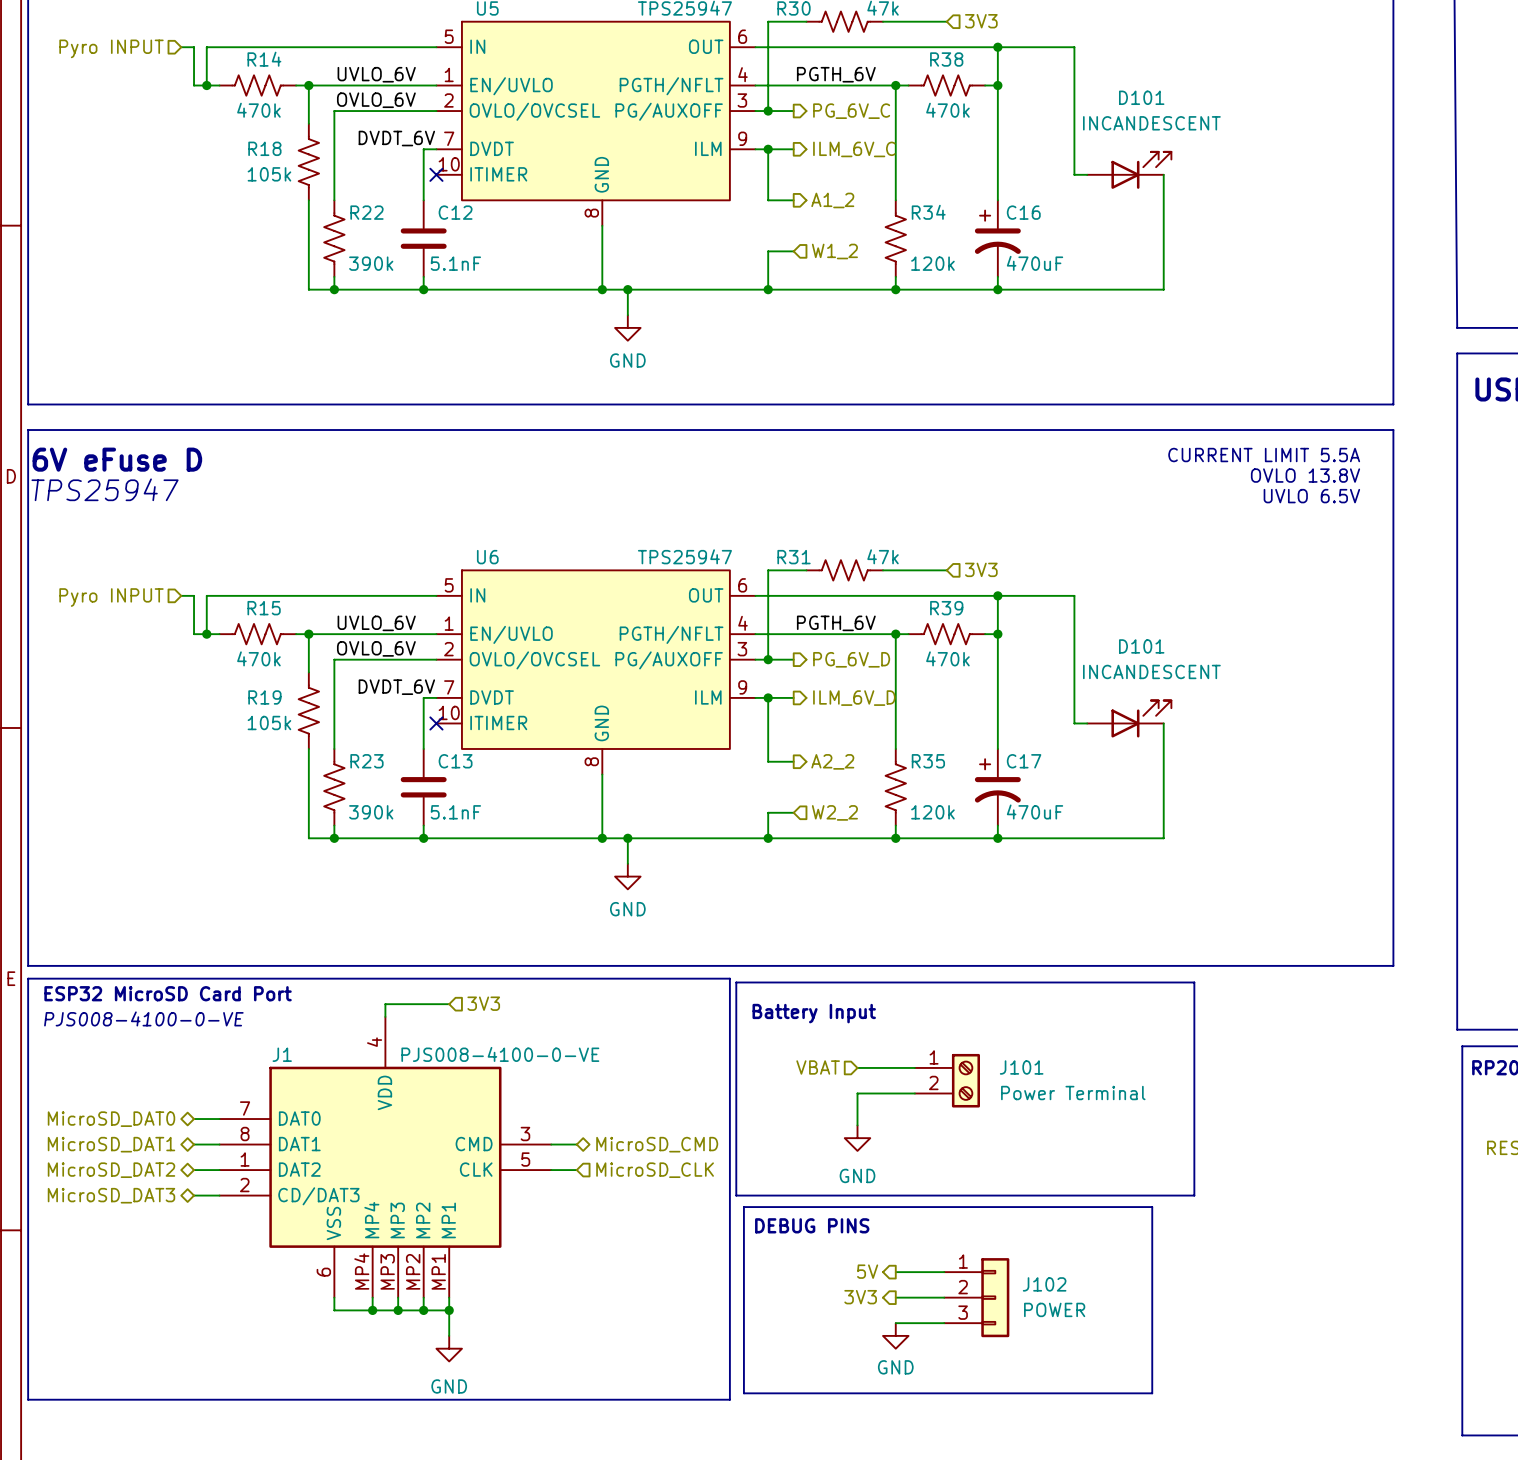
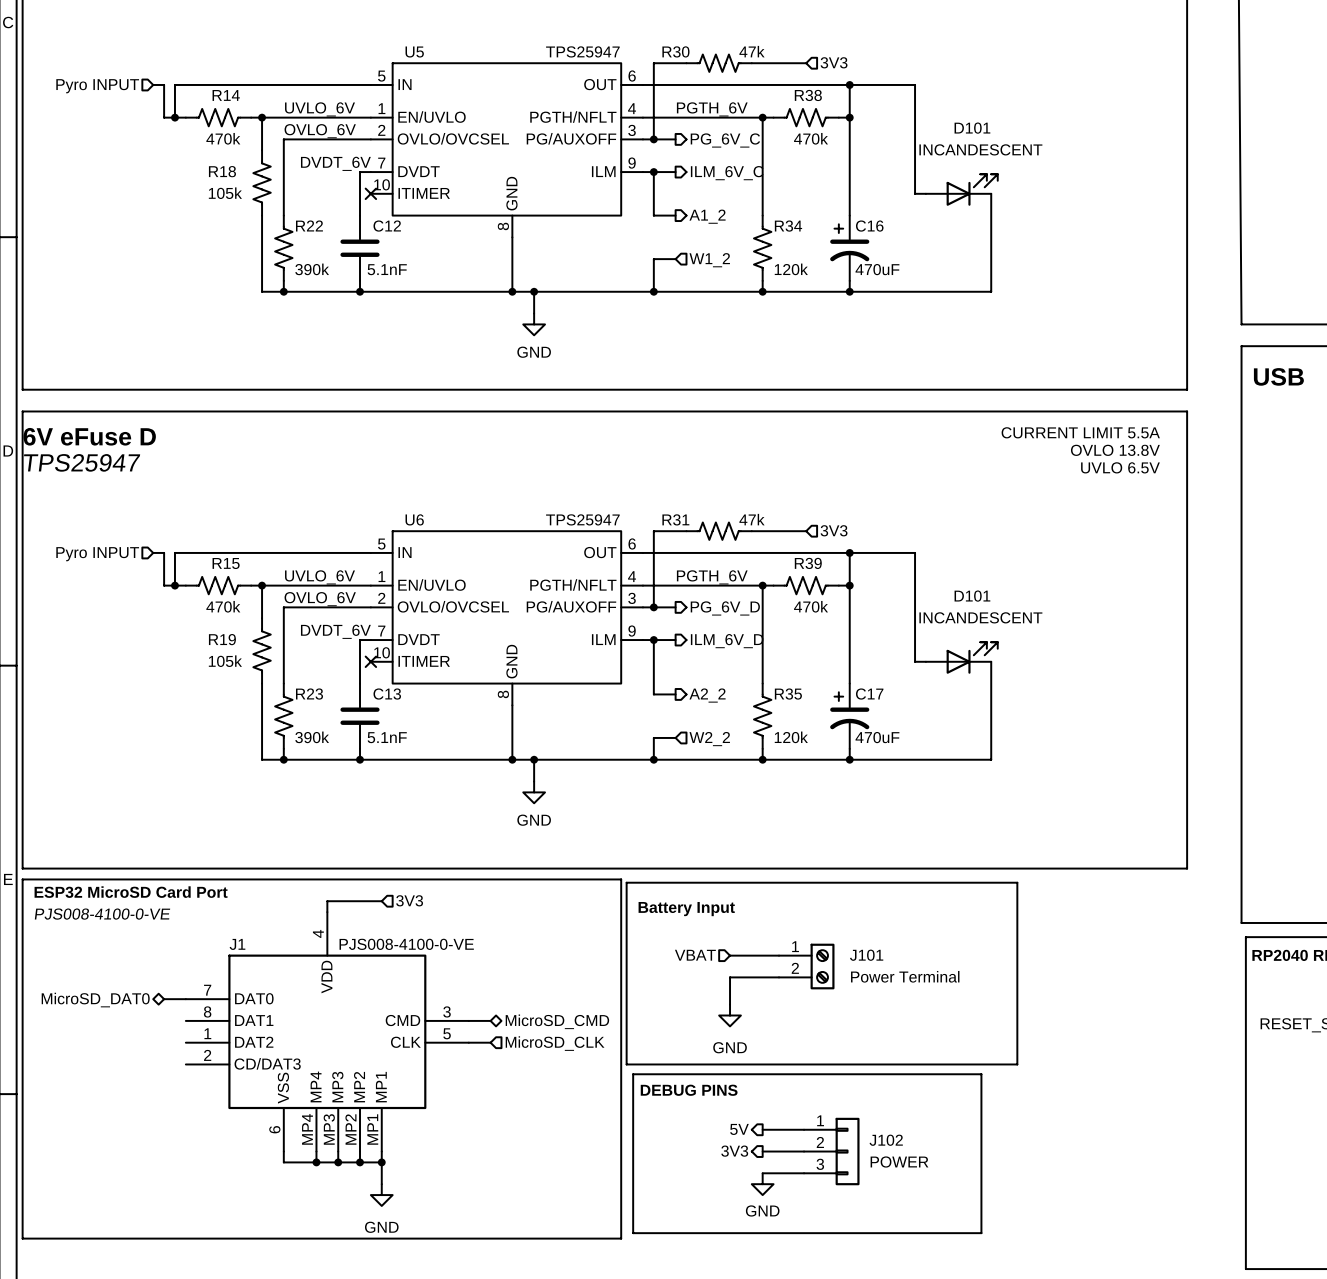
hierarchical label: MicroSD_DAT1 (111, 1144) -> none
wire: (194, 1144) (219, 1144) -> none
hierarchical label: MicroSD_DAT2 (111, 1170) -> none
wire: (194, 1170) (219, 1170) -> none
hierarchical label: MicroSD_DAT3 (111, 1195) -> none
wire: (194, 1195) (219, 1195) -> none

